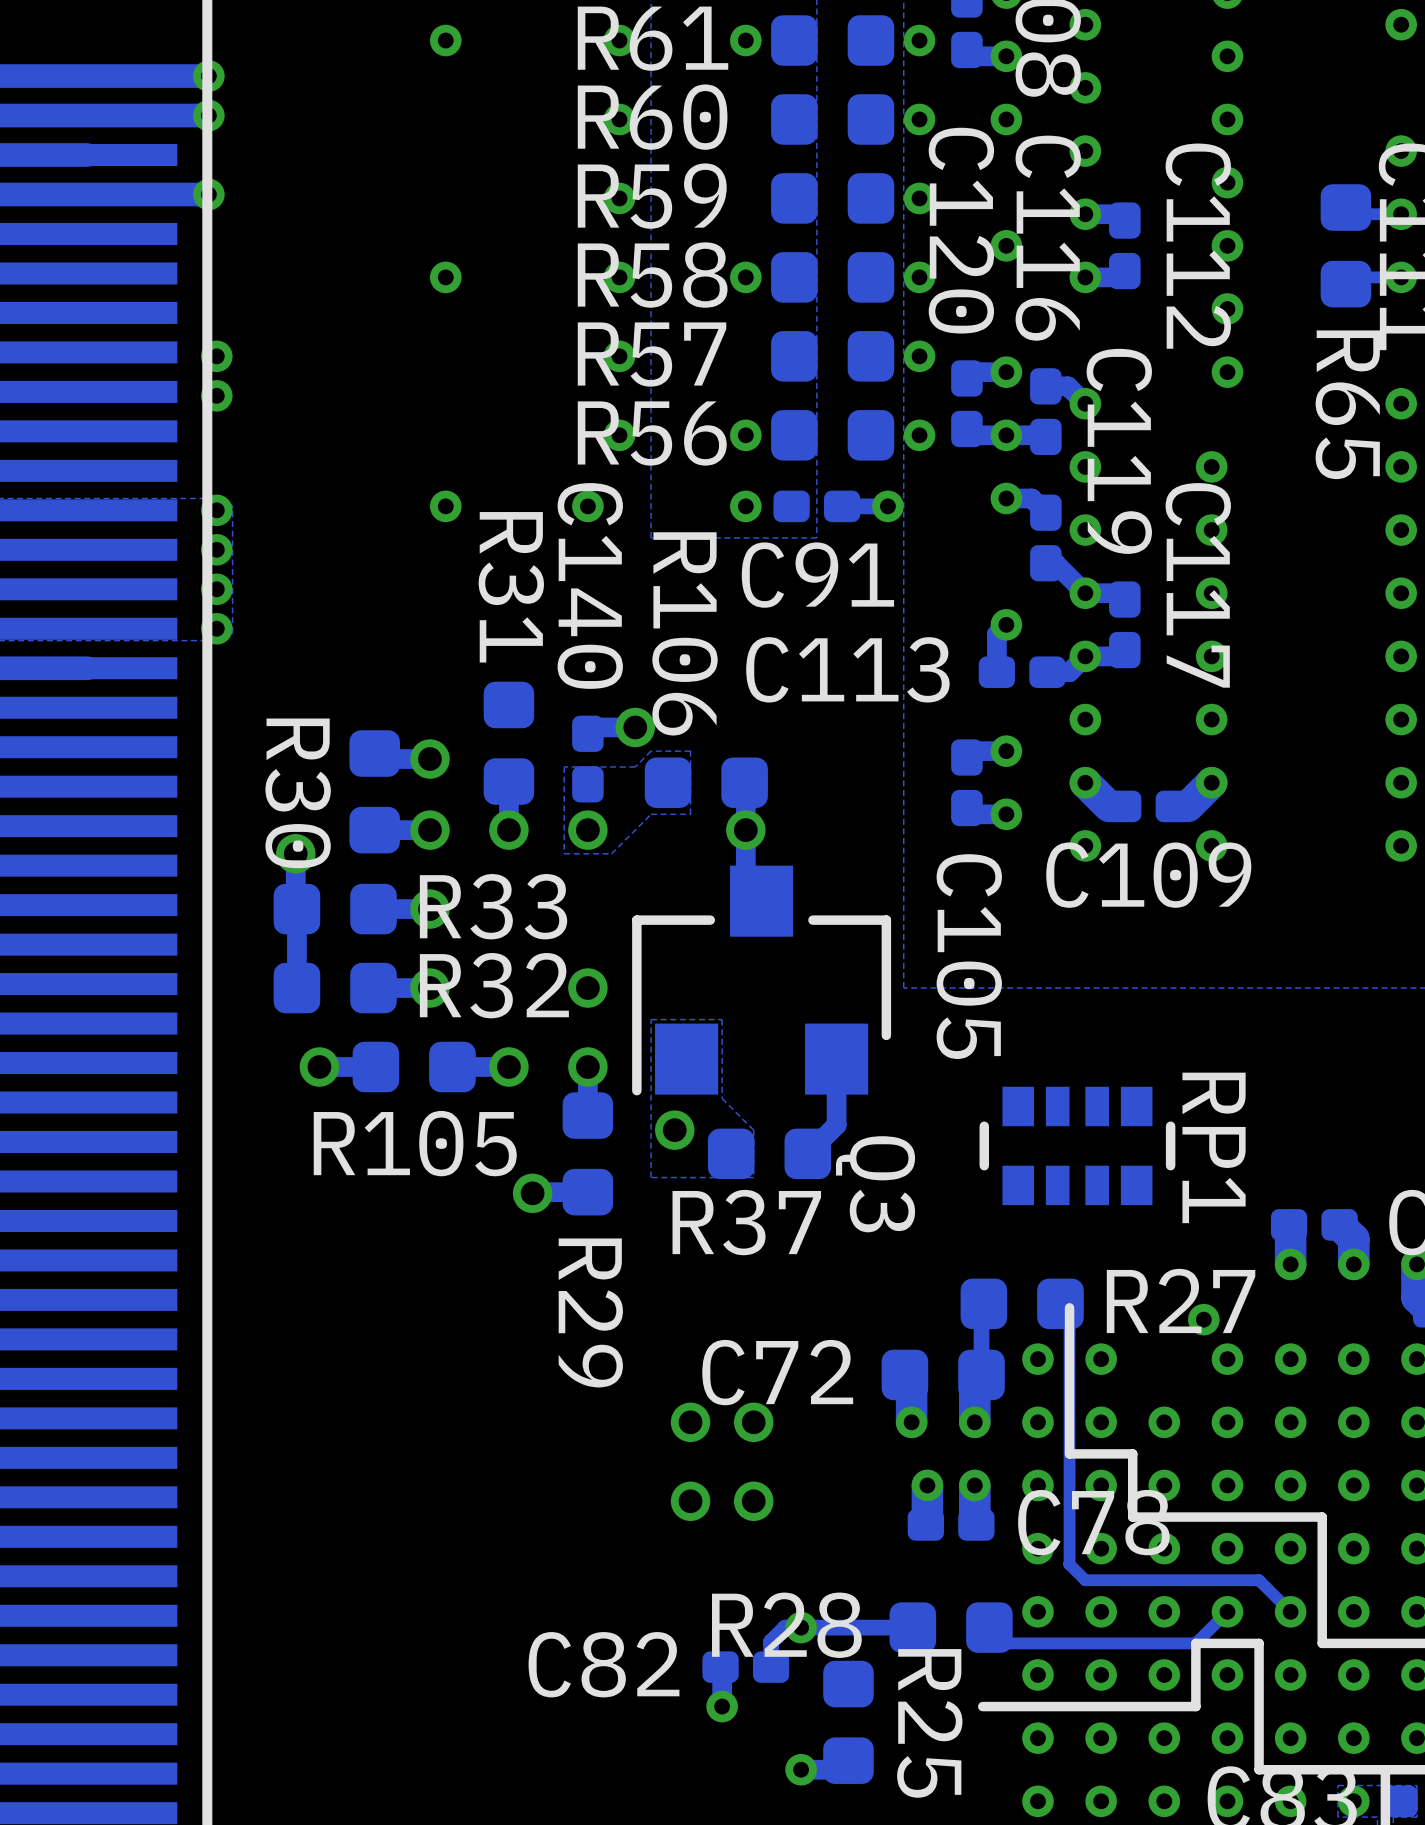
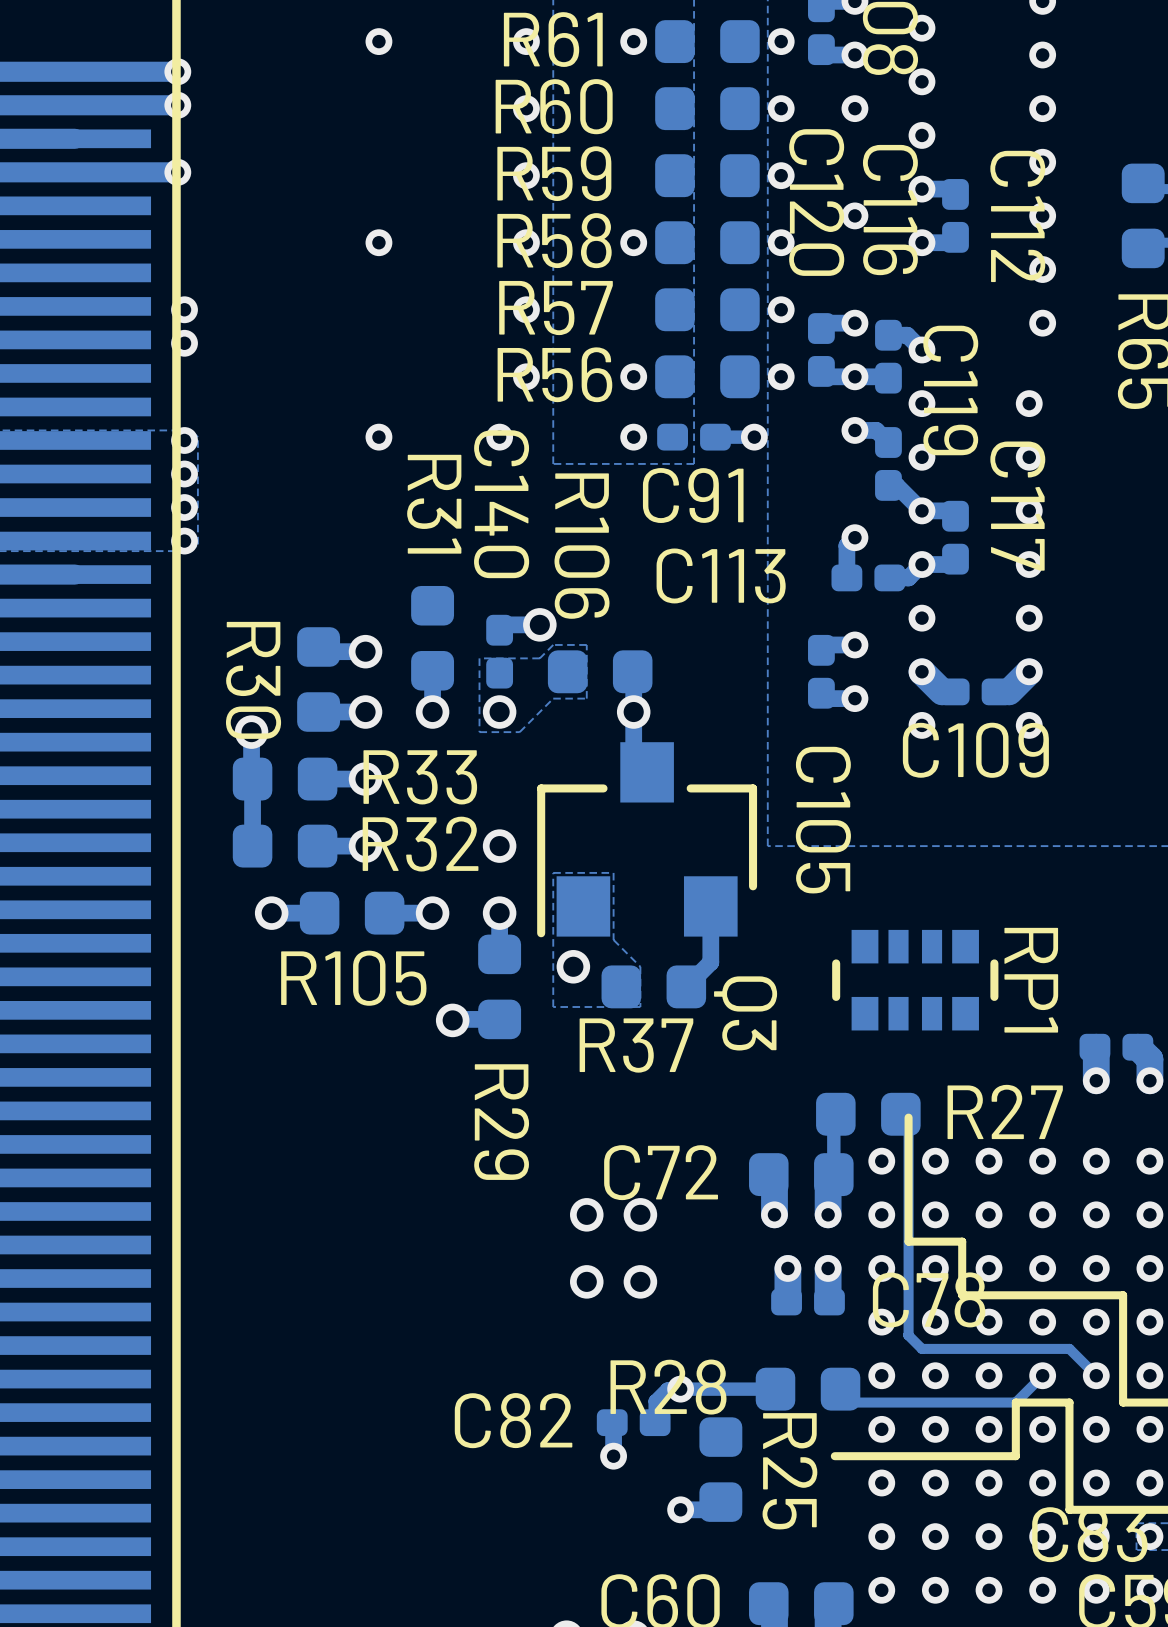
via position: (1203, 1319) -> (989, 1161)

